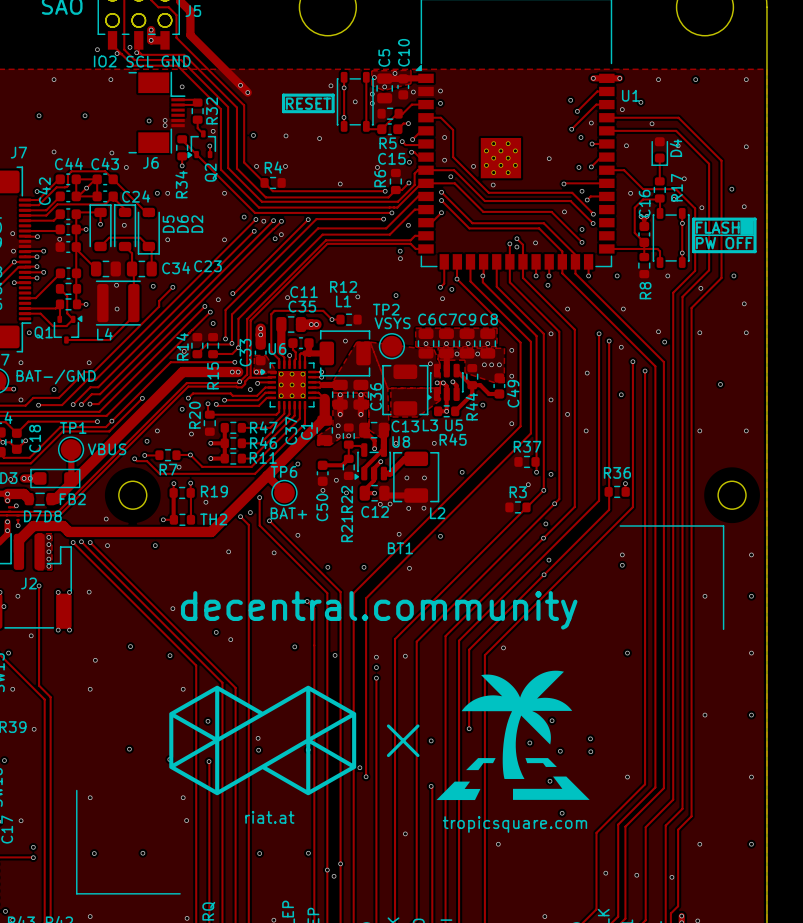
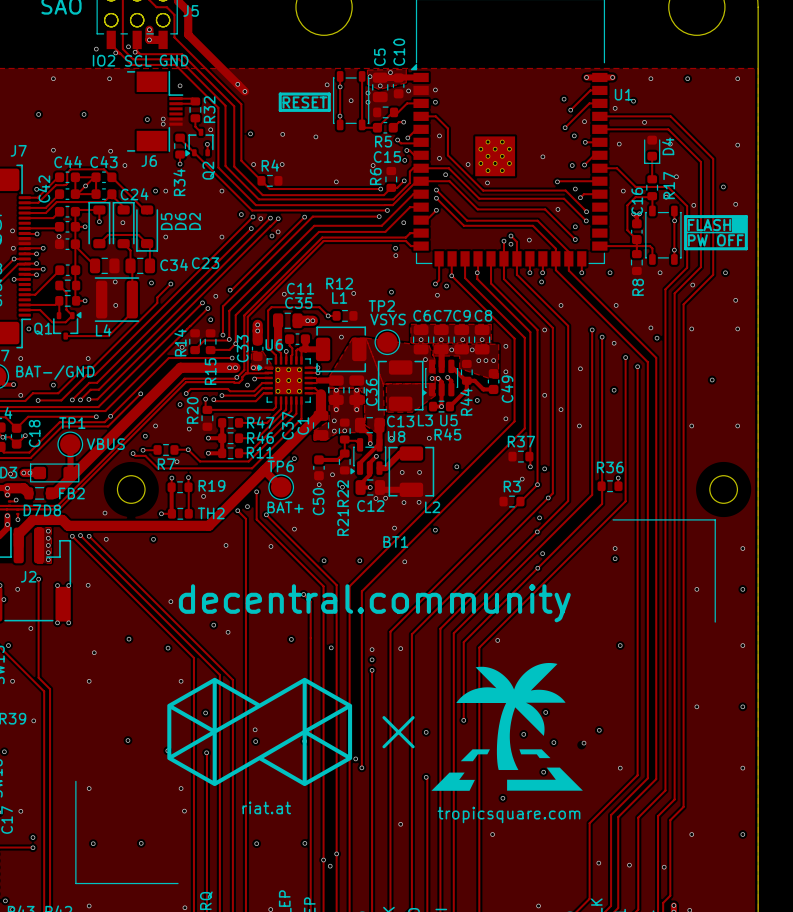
via position: (590, 738) -> (599, 730)
via: none -> (502, 798)
via: (562, 813) -> none

